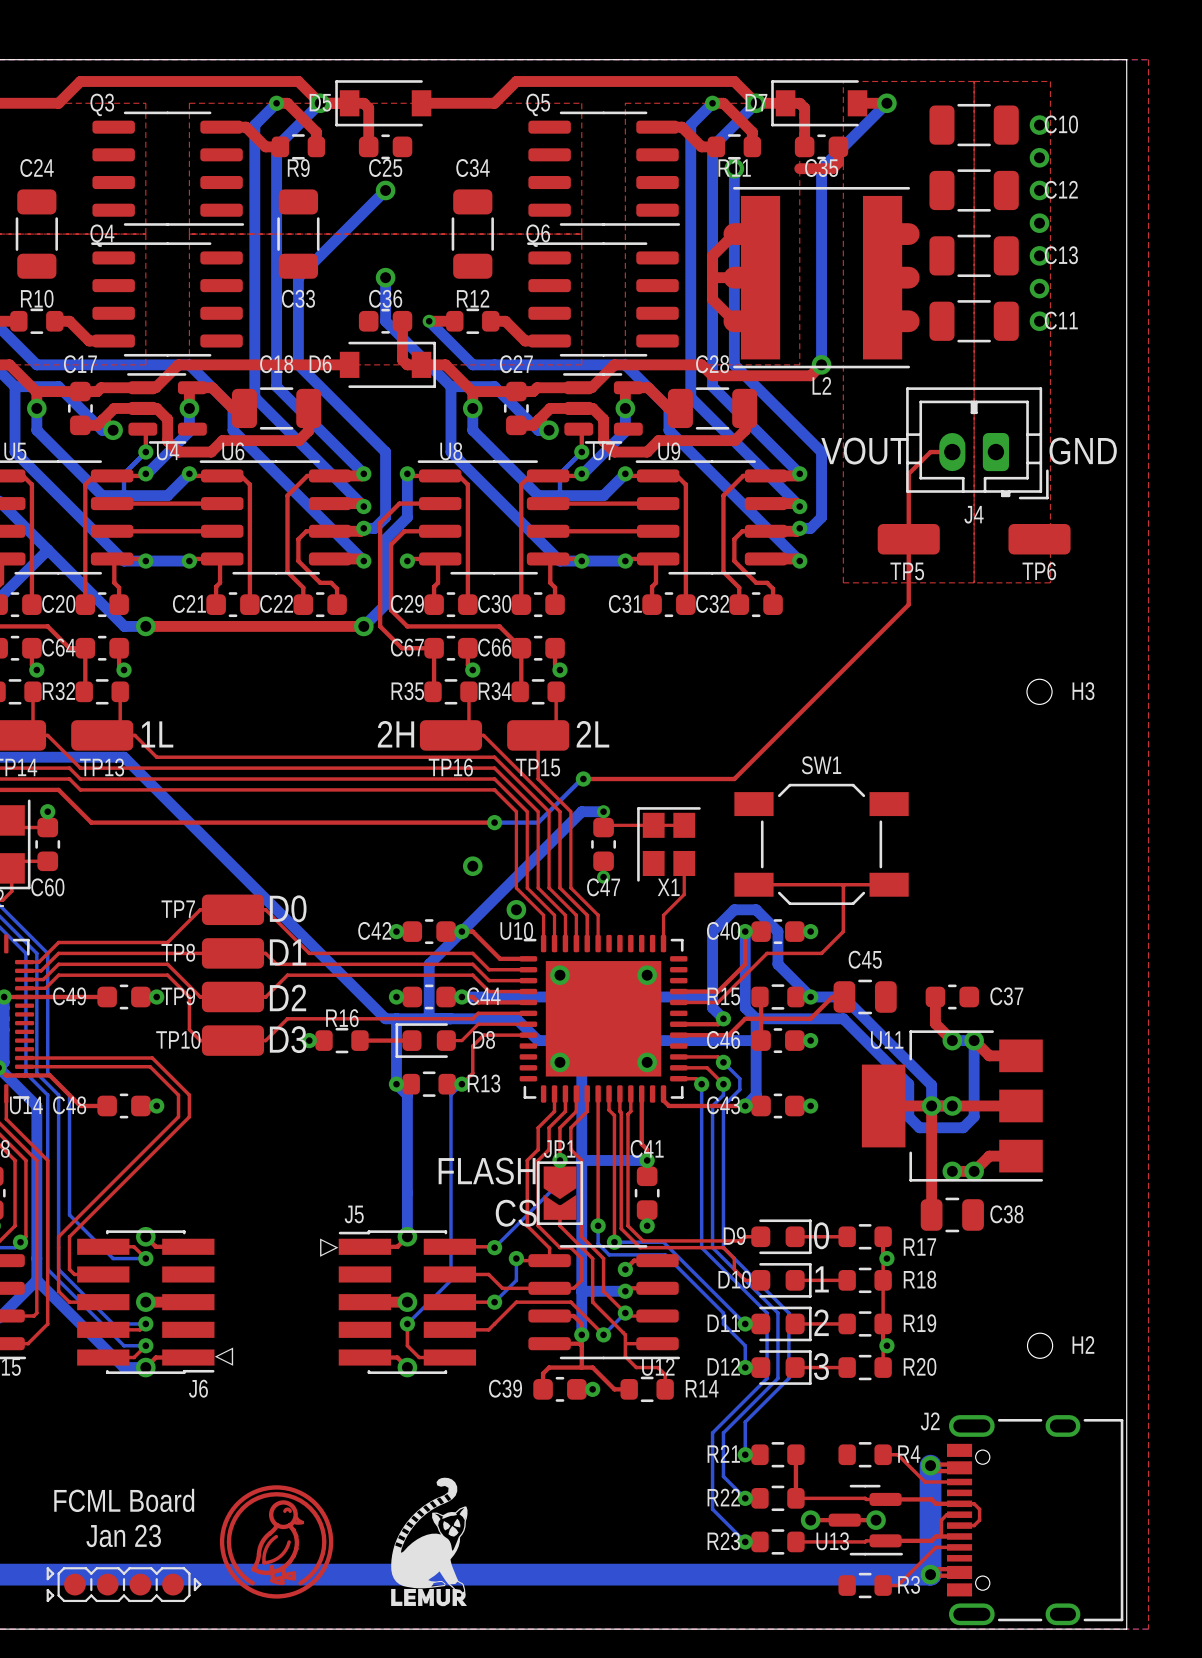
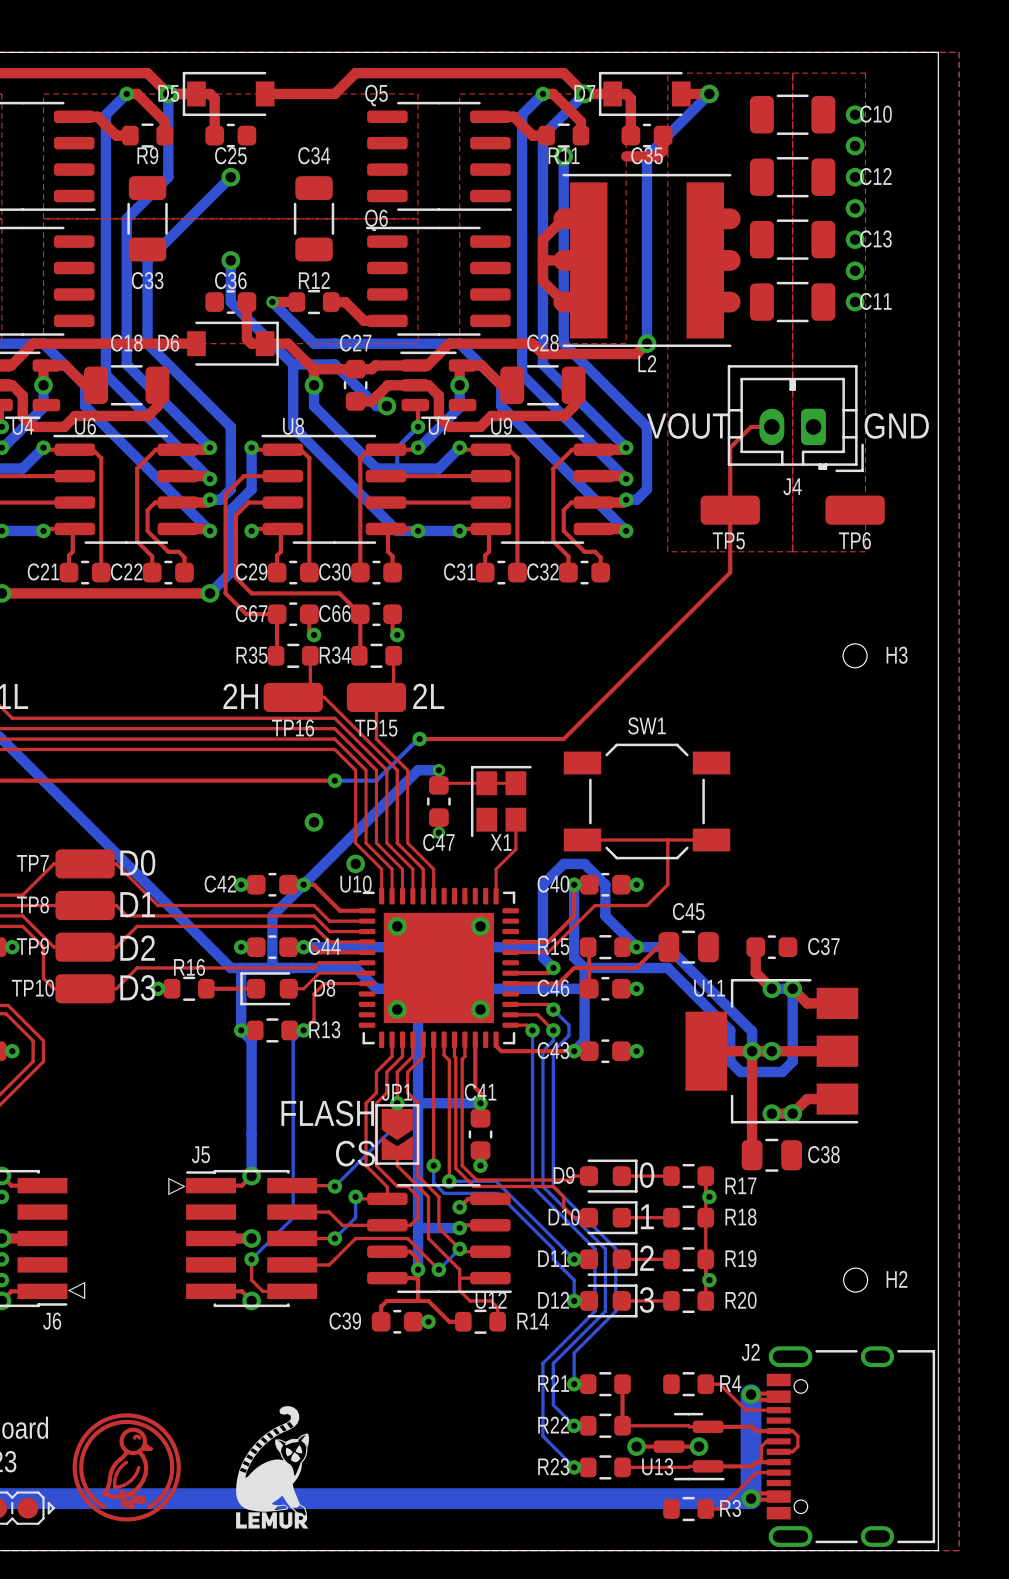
bottom track: (320, 103) (276, 146) (276, 234) -> (168, 93) (168, 177) (126, 218)

